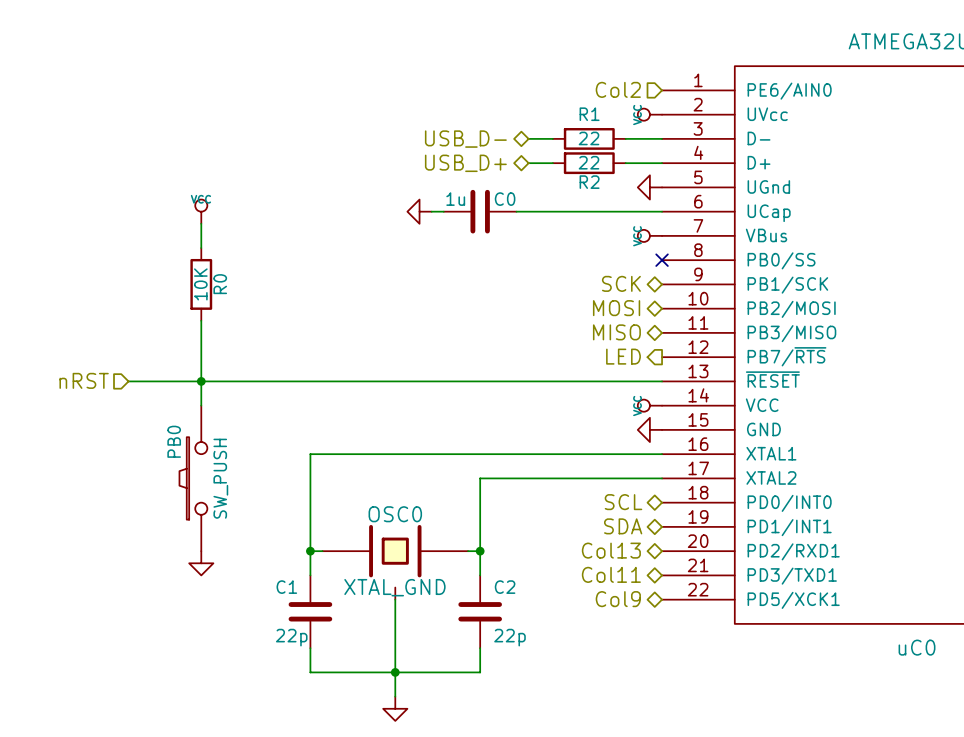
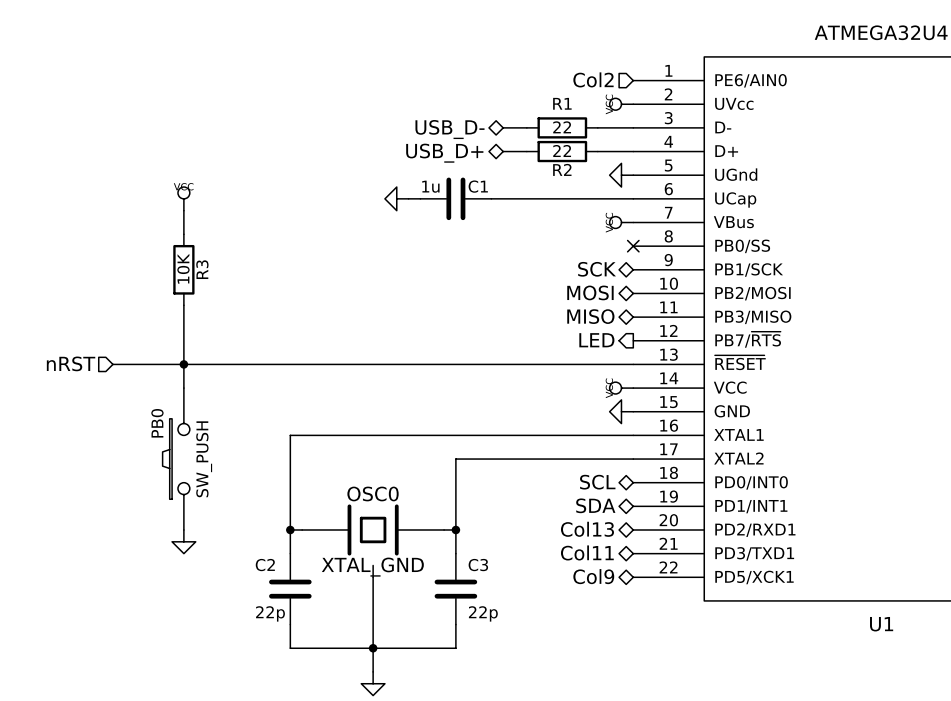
C0 name: C0 (505, 199) -> C1 (478, 186)
R0 name: R0 (220, 284) -> R3 (202, 269)
C1 name: C1 (286, 587) -> C2 (265, 565)
C2 name: C2 (505, 587) -> C3 (478, 565)
uC0 name: uC0 (917, 647) -> U1 (881, 624)

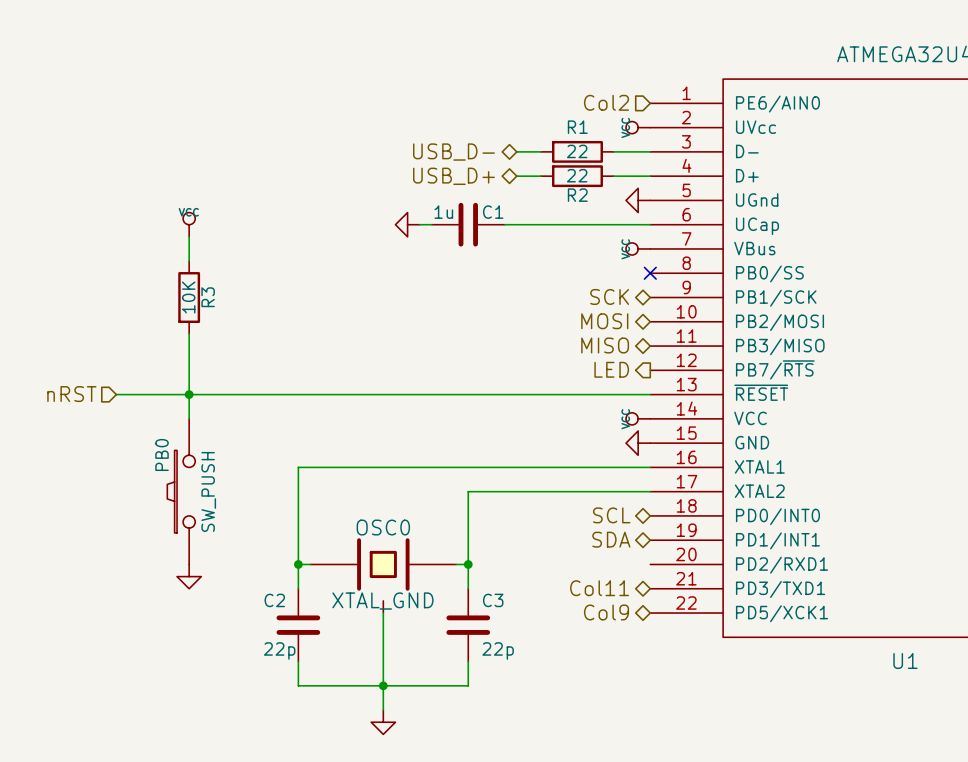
hierarchical label: Col13 (587, 529) -> none

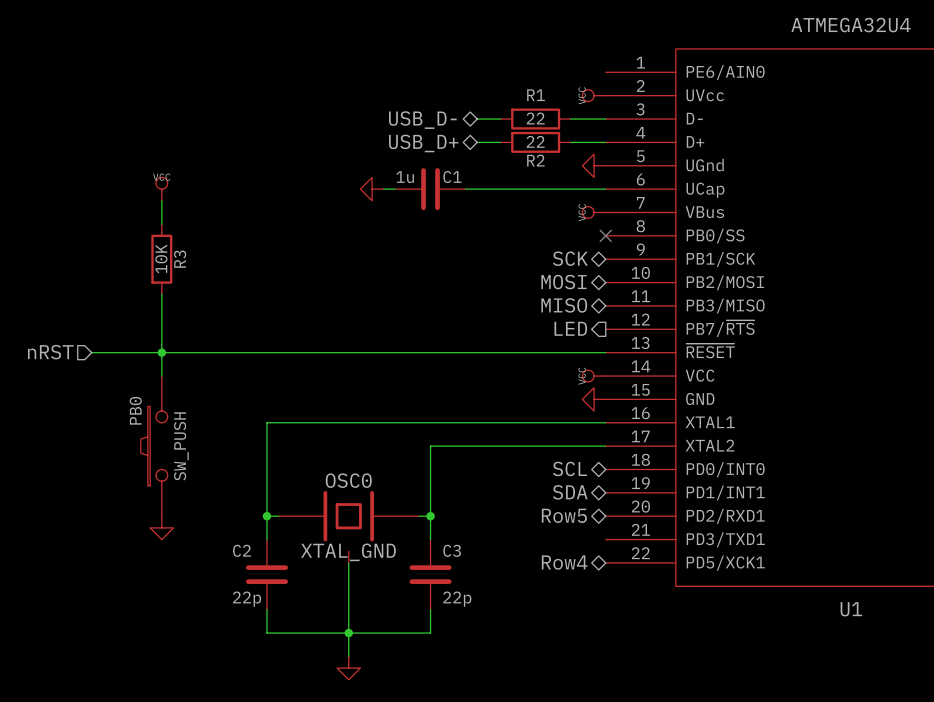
hierarchical label: Col2 (606, 102) -> none
hierarchical label: none -> Row5 (564, 515)
hierarchical label: Col11 (599, 588) -> none
hierarchical label: Col9 (606, 612) -> Row4 (564, 562)

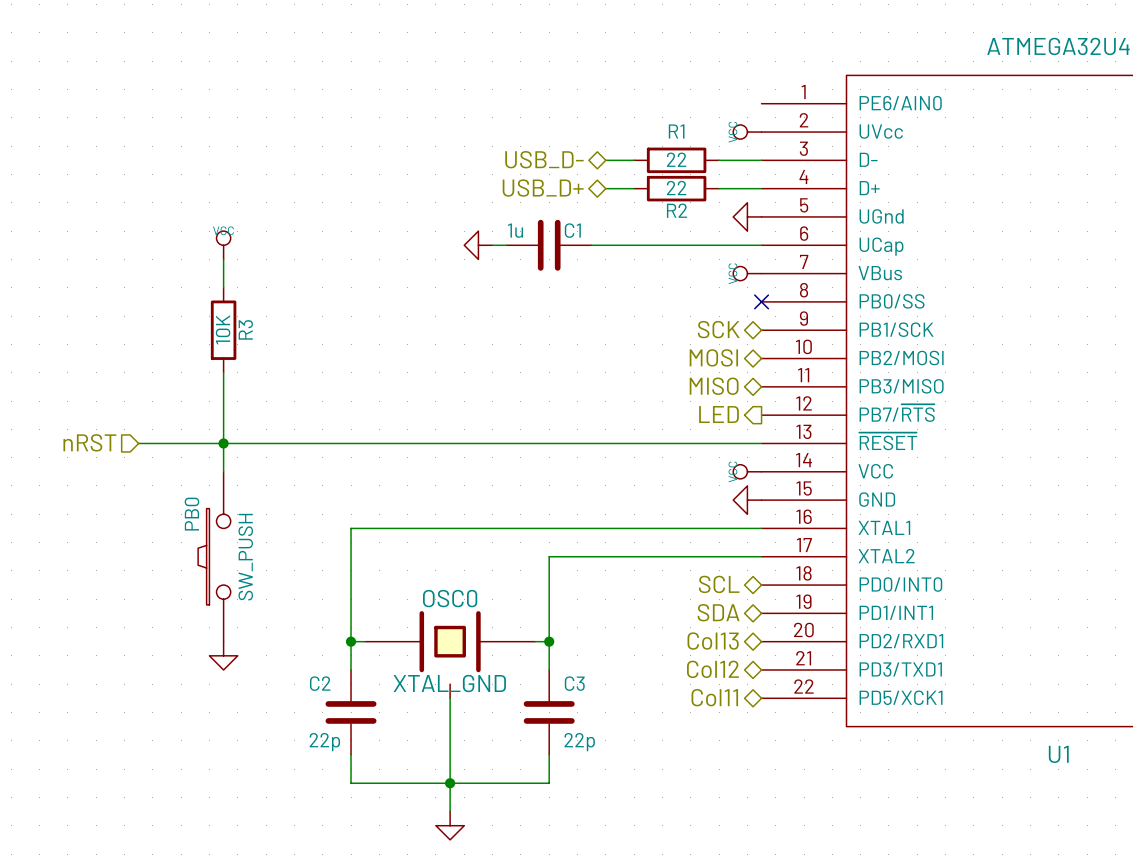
hierarchical label: Row5 (564, 515) -> Col13 (713, 641)
hierarchical label: none -> Col12 (712, 669)
hierarchical label: Row4 (564, 562) -> Col11 (714, 697)

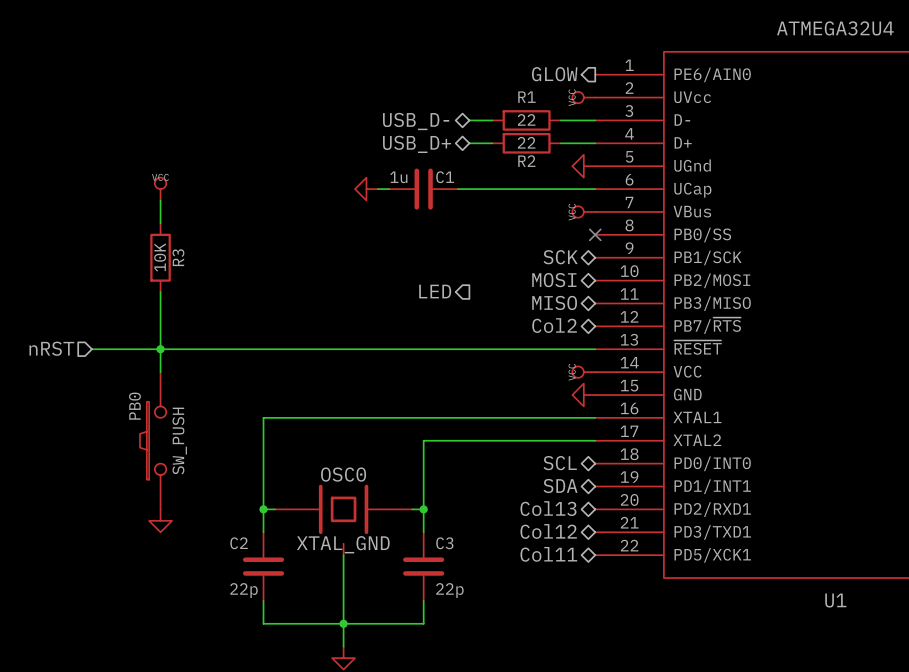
hierarchical label: none -> GLOW (554, 74)
hierarchical label: none -> LED (435, 291)
hierarchical label shape: output (718, 414) -> bidirectional (554, 325)
hierarchical label: LED (718, 414) -> Col2 (554, 325)

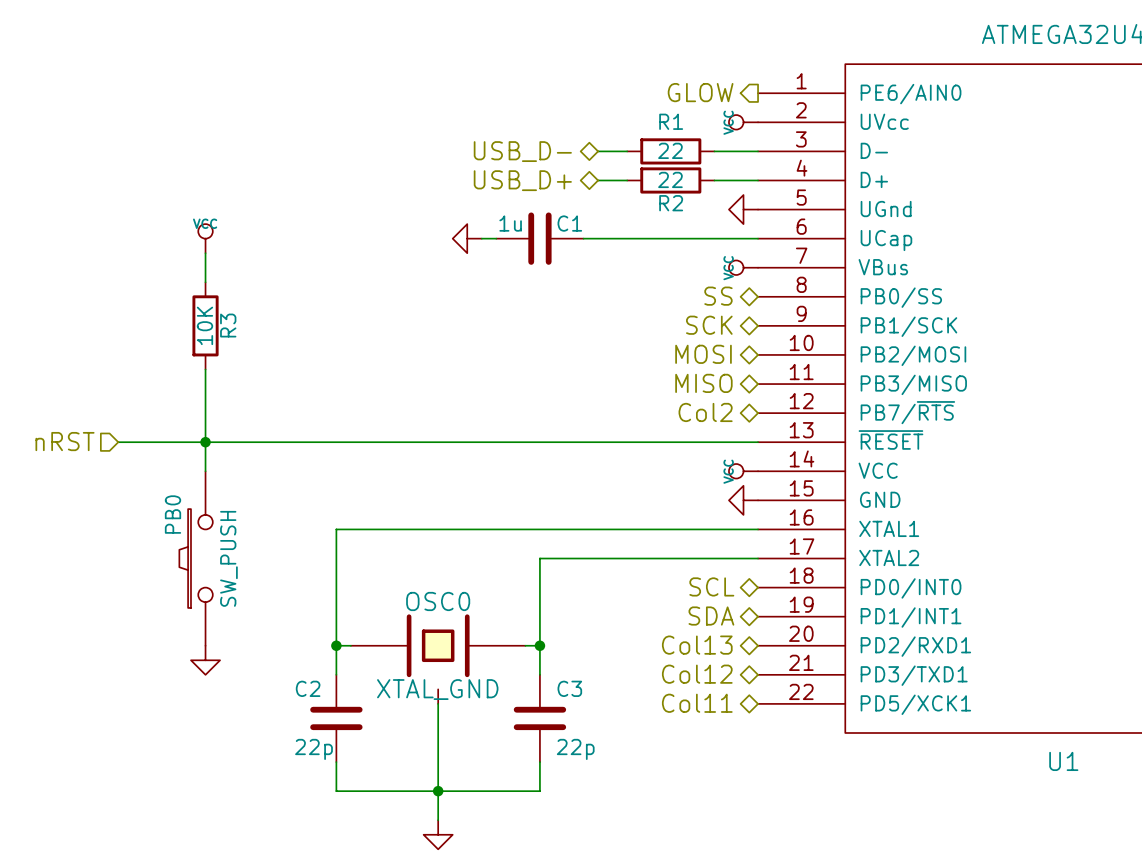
hierarchical label: none -> SS (718, 296)
no-connect mark: (595, 234) -> none
hierarchical label: LED (435, 291) -> none

